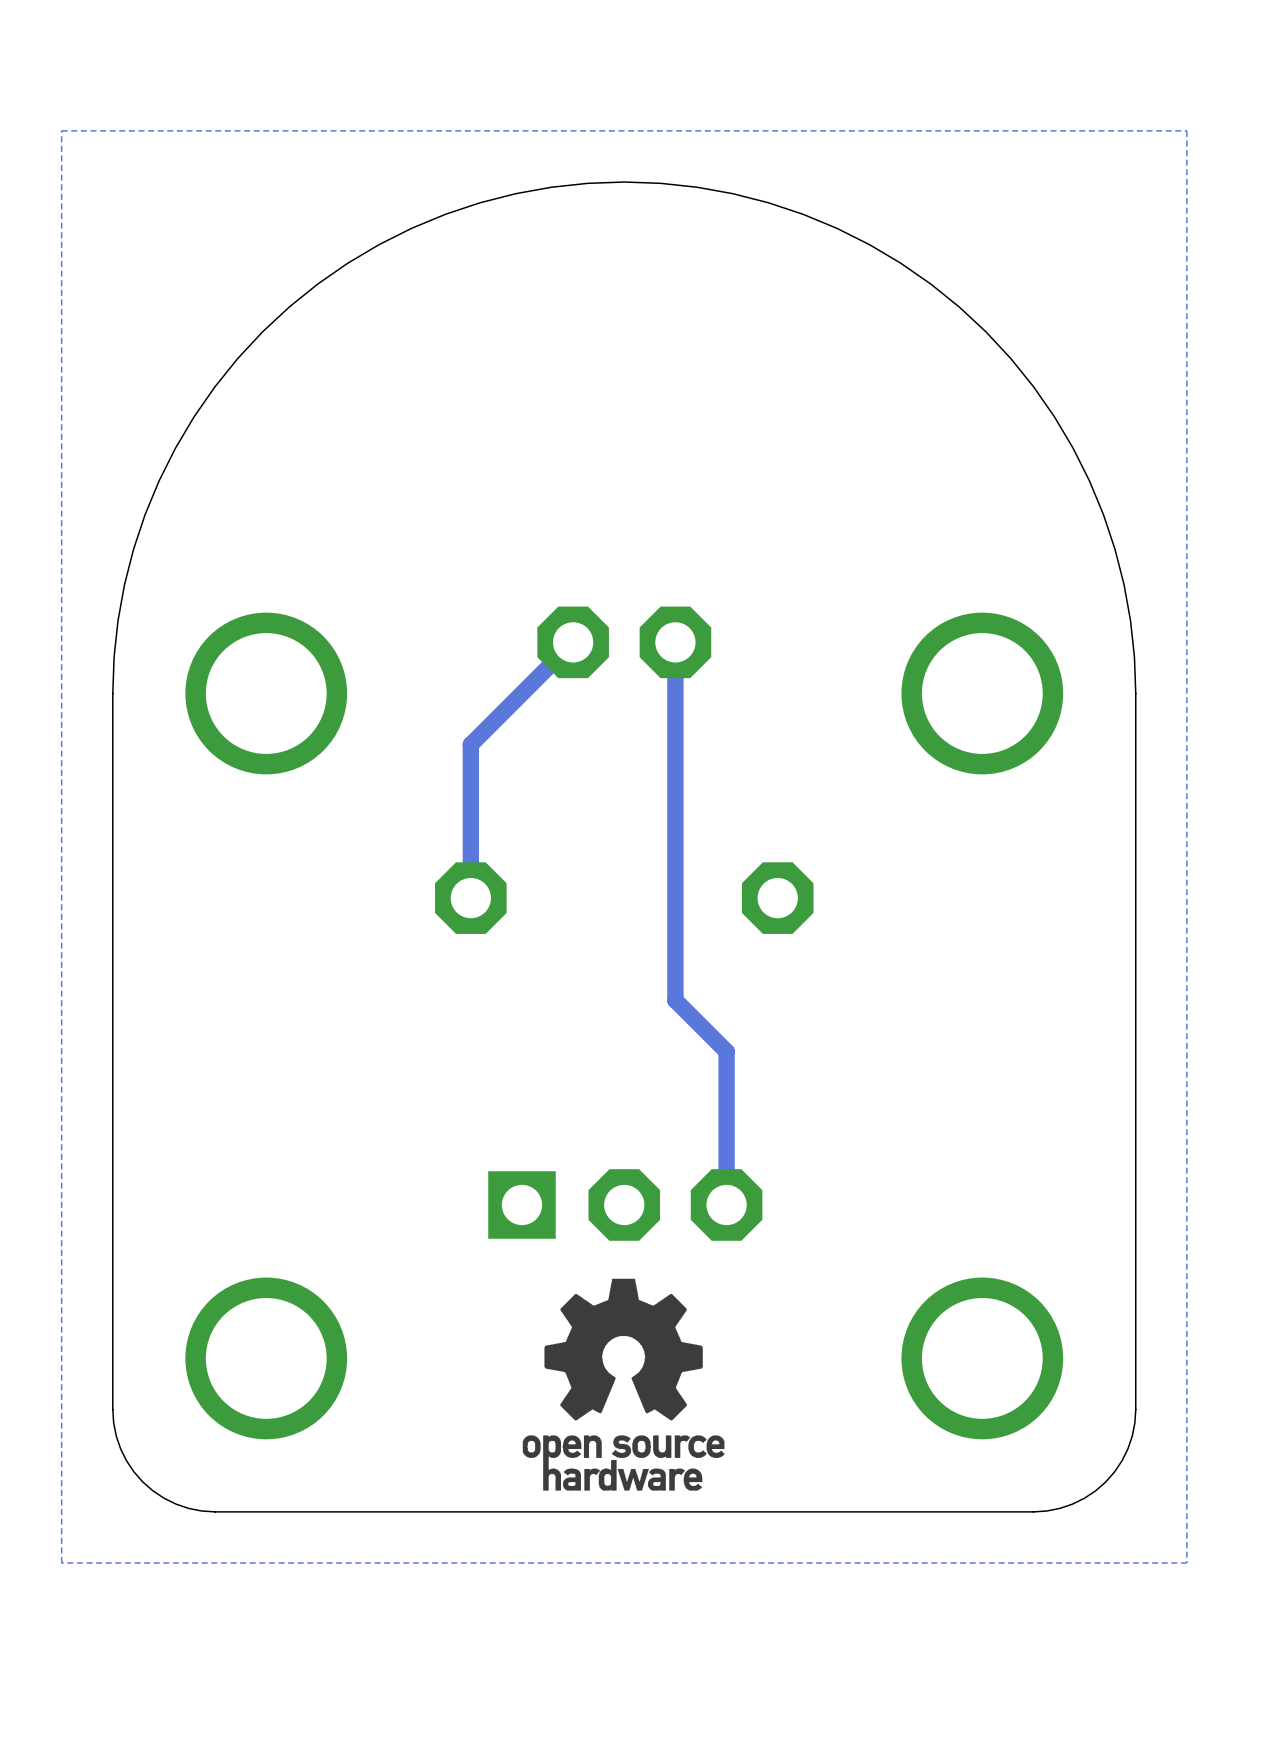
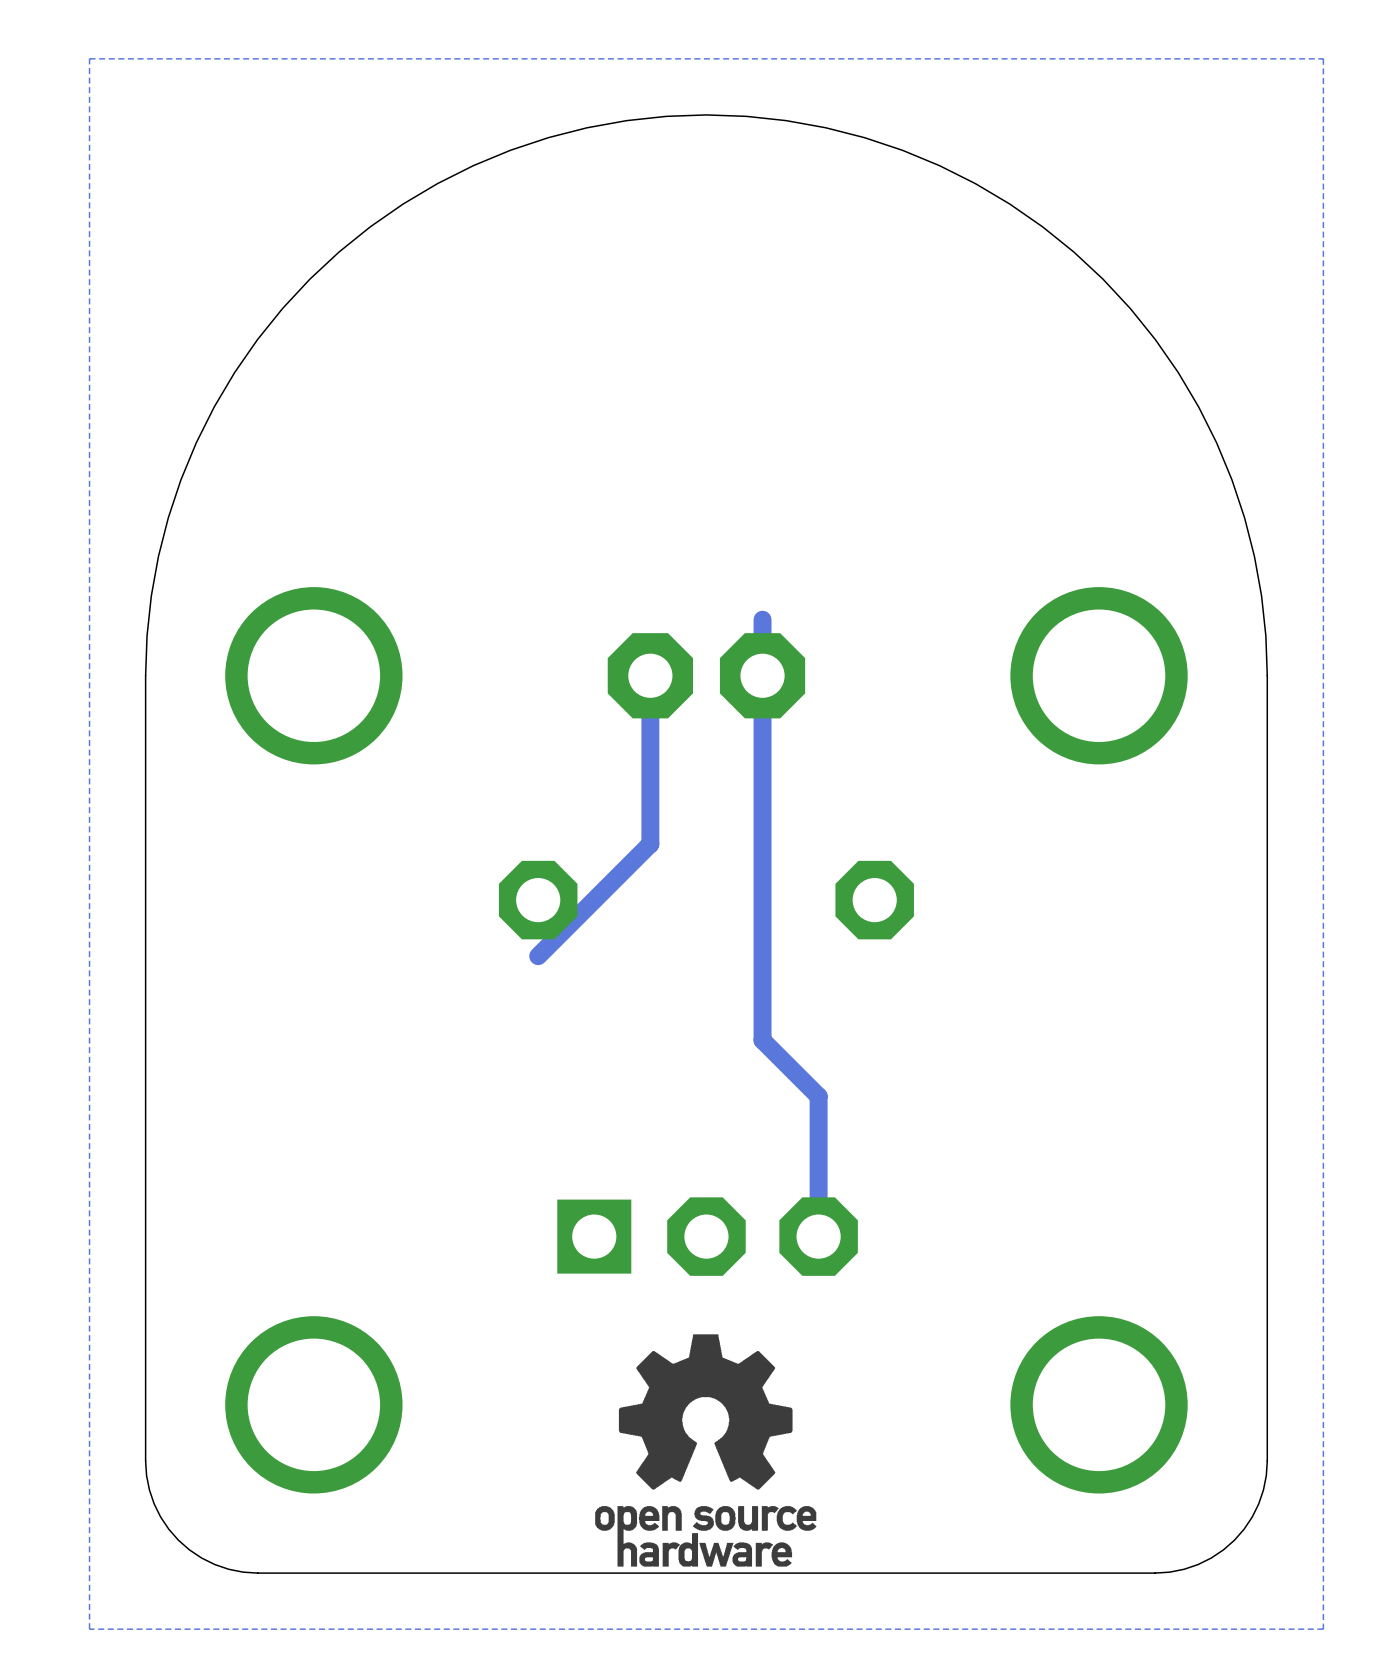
track: (573, 642) (470, 744) (470, 898) -> none
part: (624, 642) -> none
track: none -> (650, 675) (650, 844) (538, 956)
part: none -> (706, 675)
track: (675, 1000) (726, 1051) (726, 1077) -> (762, 1012) (762, 1040) (818, 1096)
drawing position: (623, 1384) -> (705, 1450)

